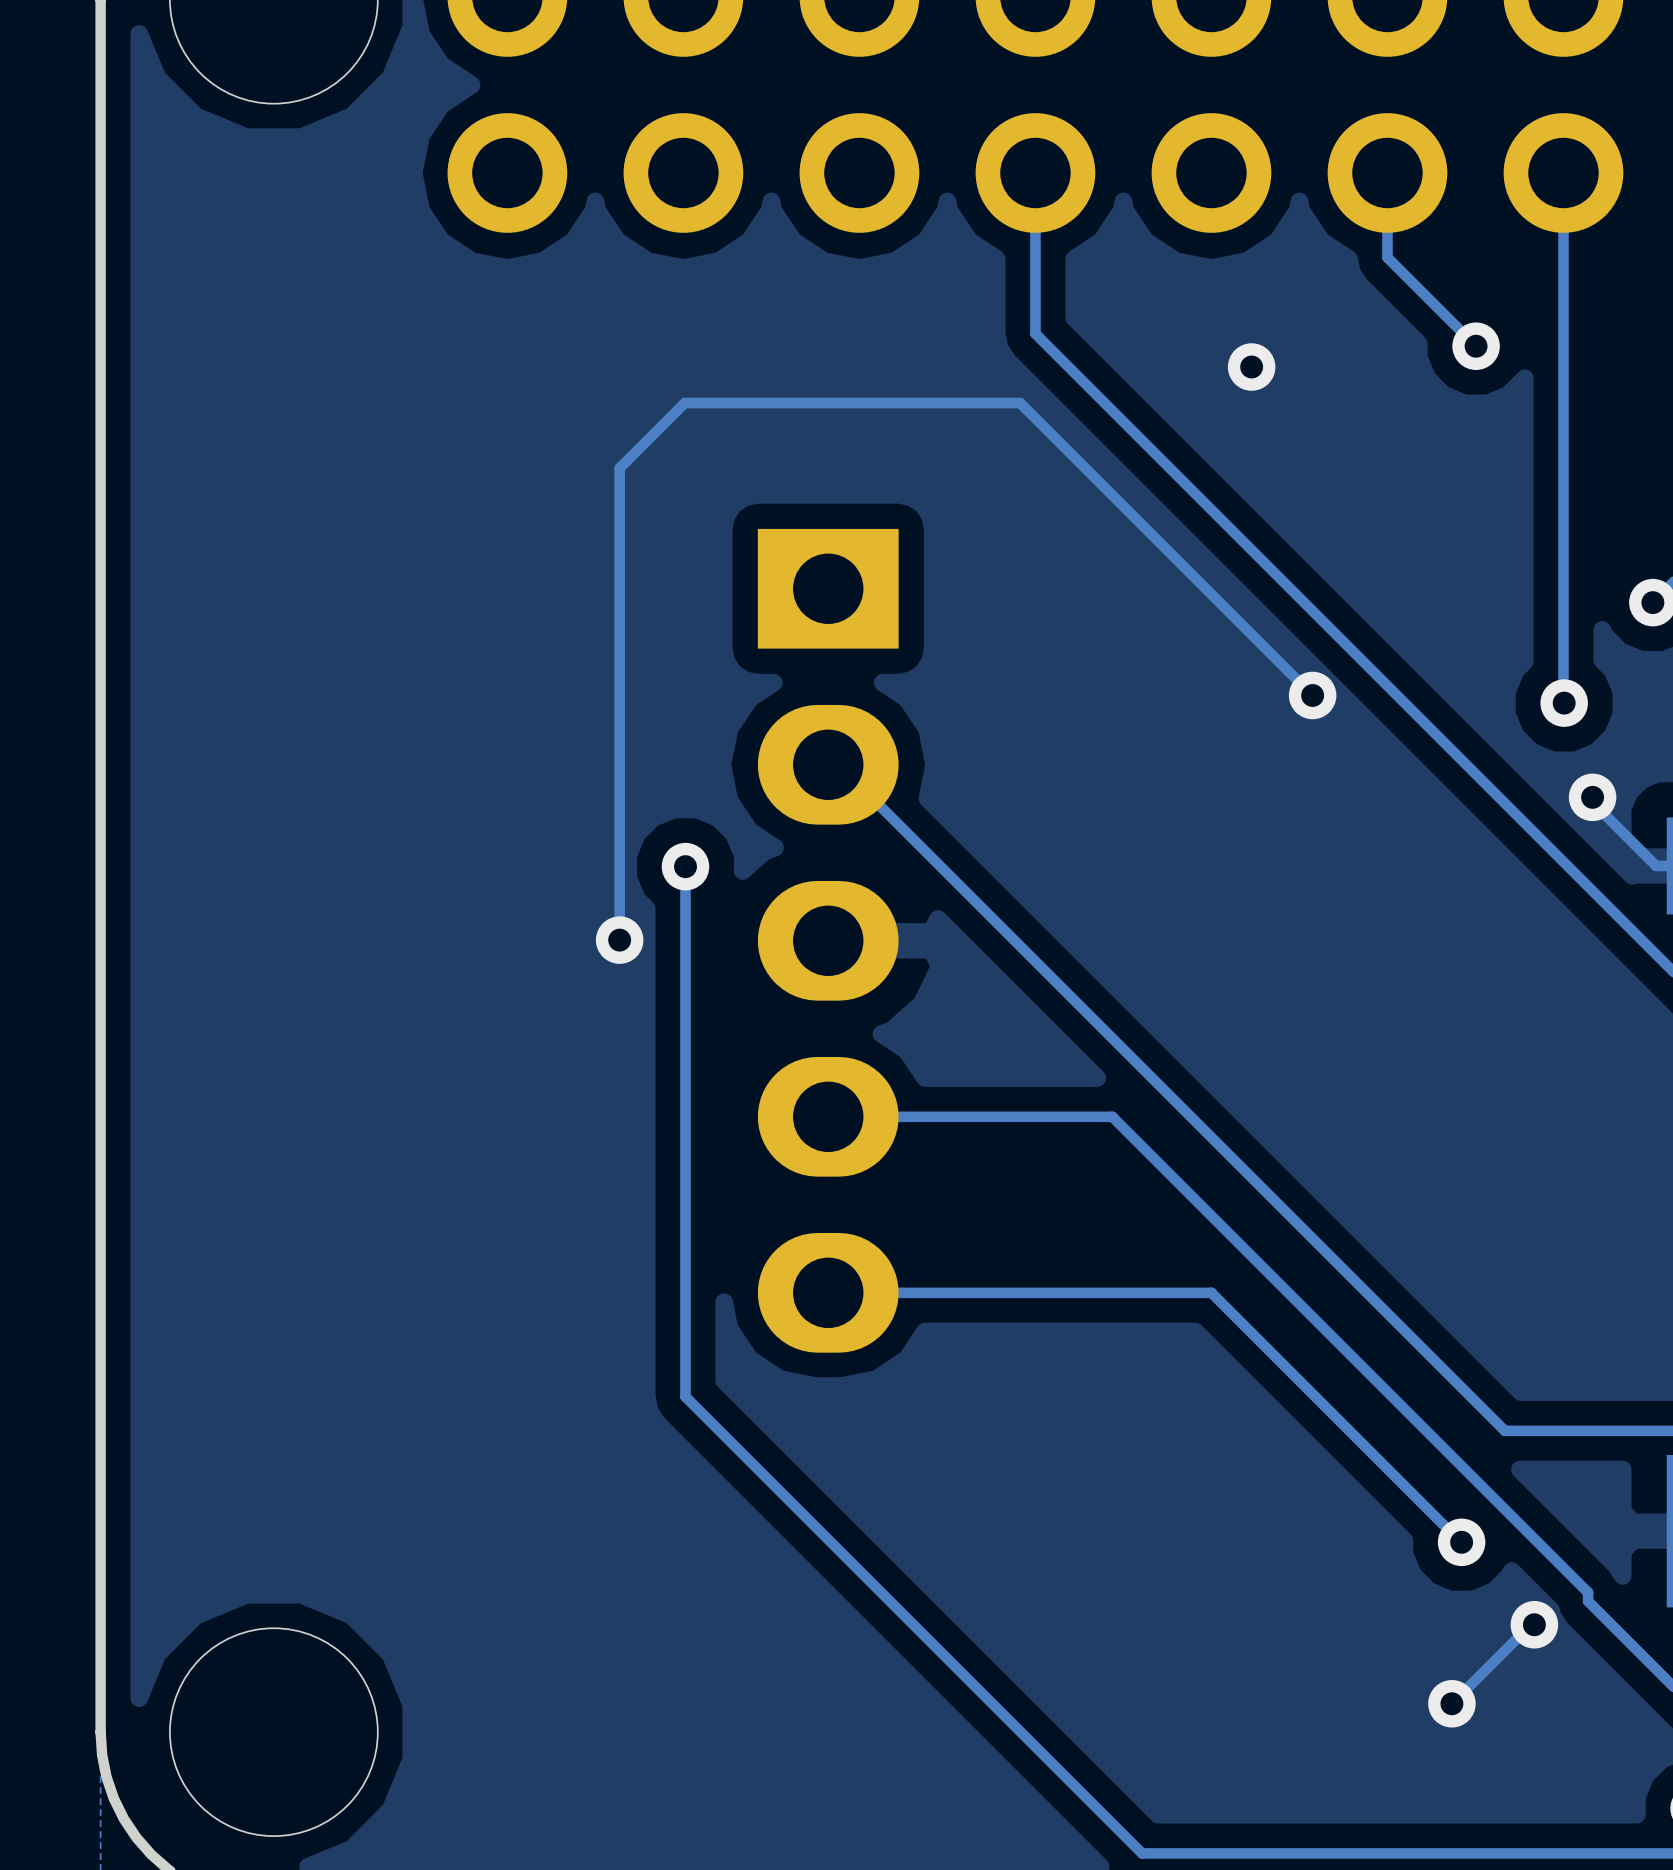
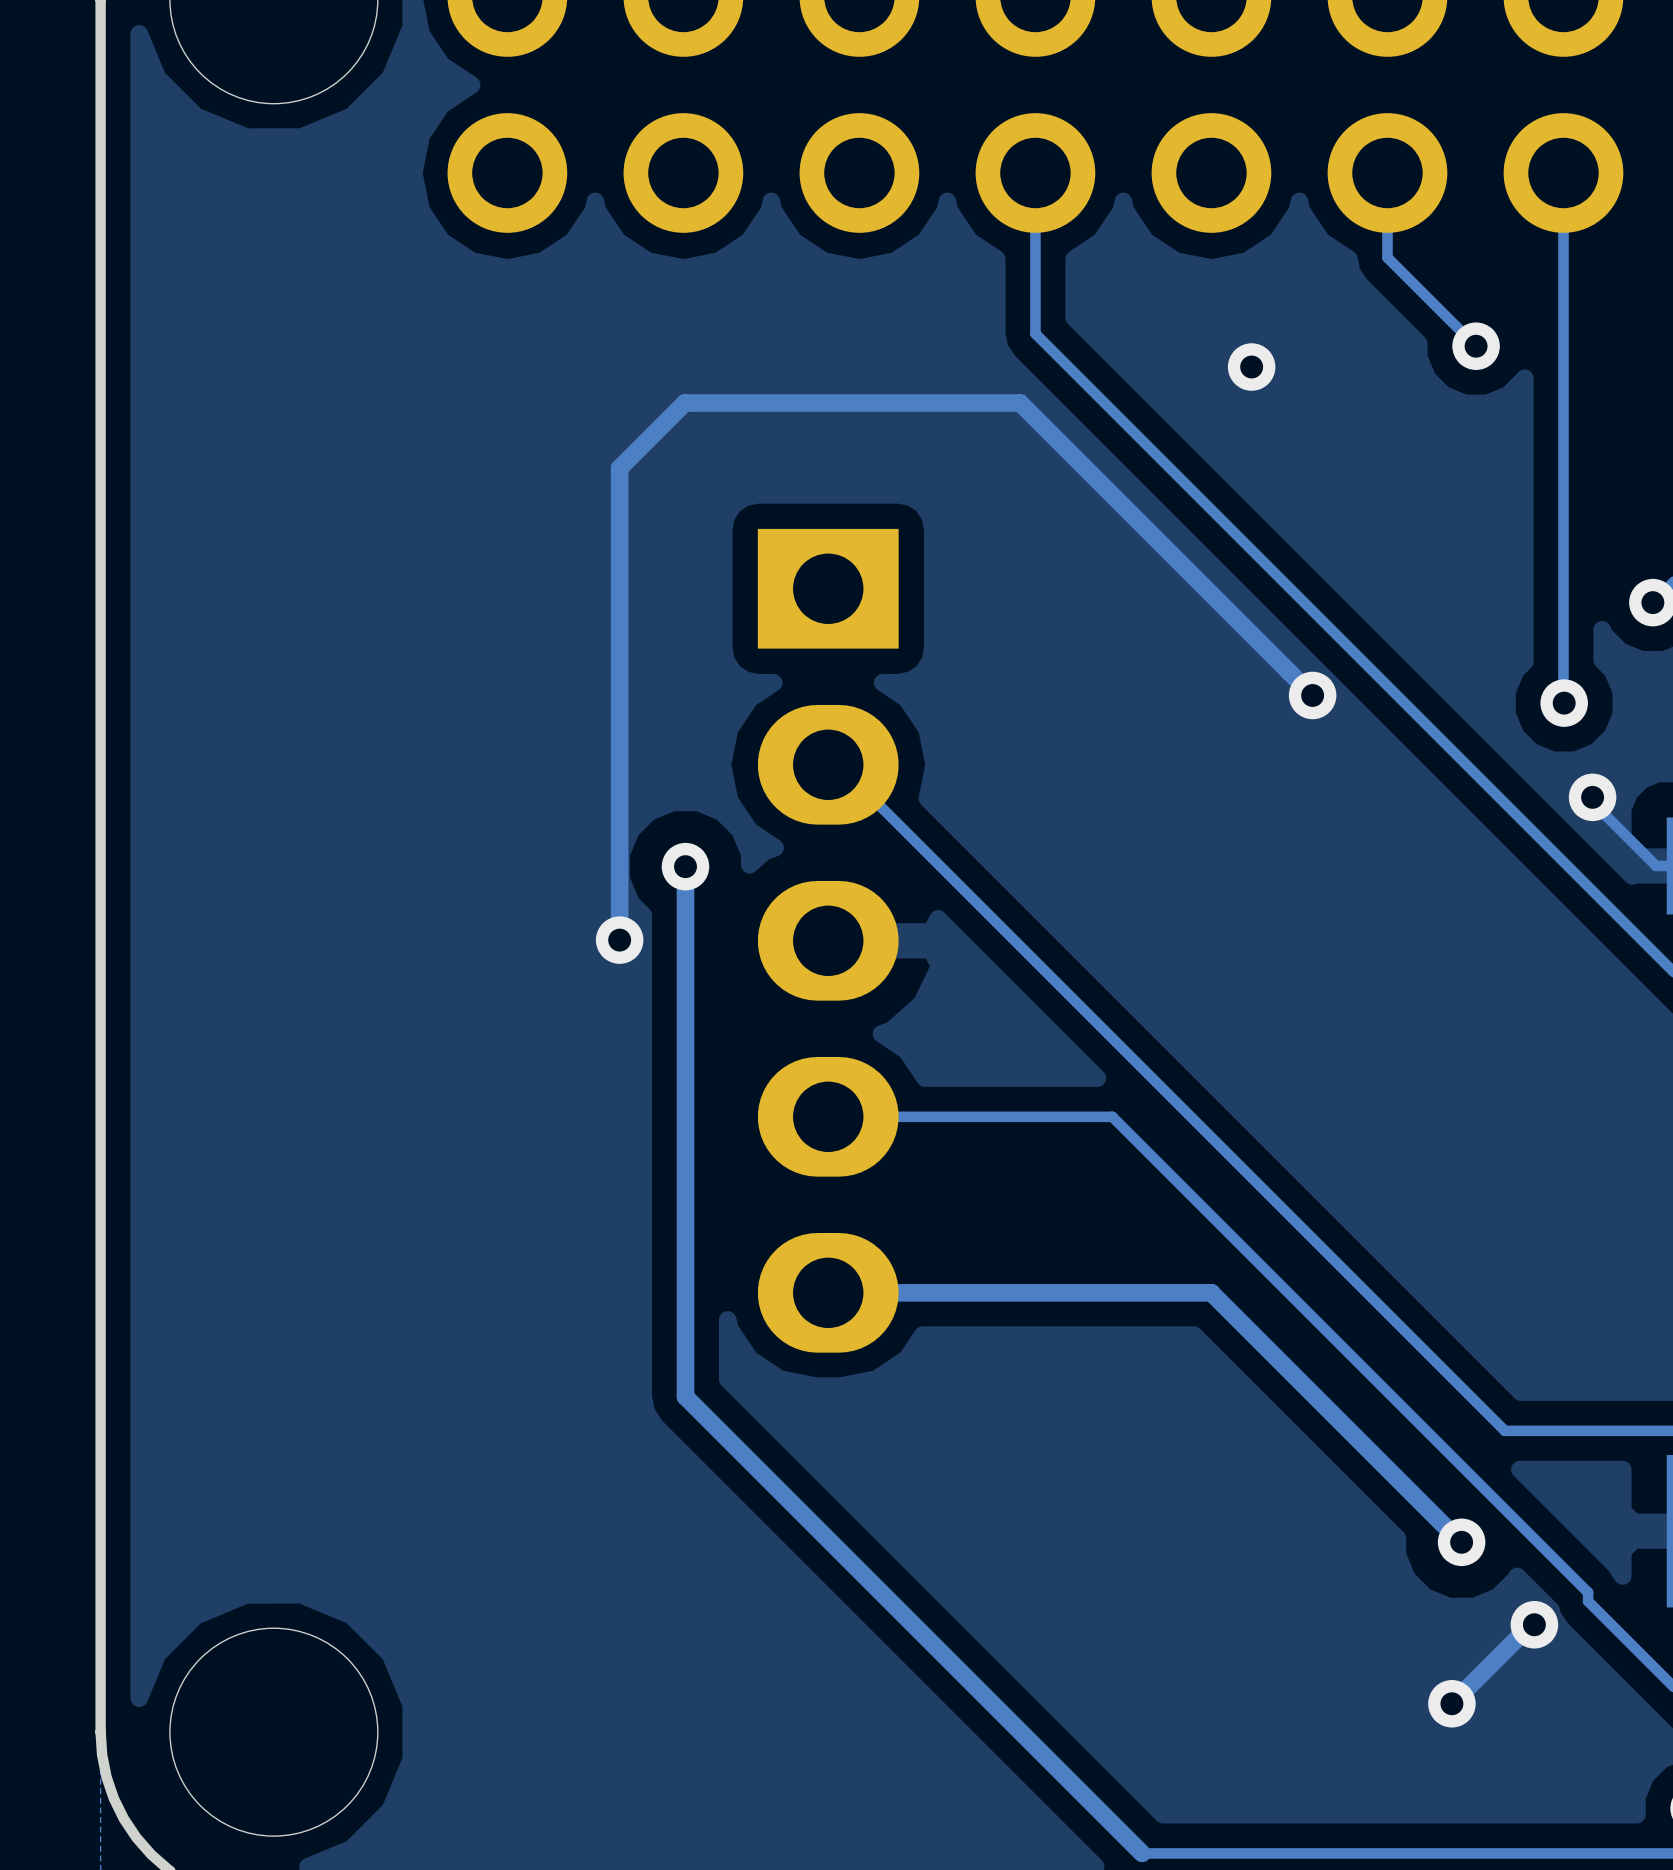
track width: thin (1312, 695) (1020, 403) (684, 403) (619, 468) (619, 940) -> thick (1312, 695) (1020, 403) (684, 403) (619, 468) (619, 940)
track width: thin (685, 866) (685, 1396) (1142, 1853) -> thick (685, 866) (685, 1396) (1142, 1853)
track width: thin (828, 1292) (1211, 1292) (1460, 1542) -> thick (828, 1292) (1211, 1292) (1460, 1542)
track width: thin (1534, 1624) (1530, 1624) (1451, 1703) -> thick (1534, 1624) (1530, 1624) (1451, 1703)

